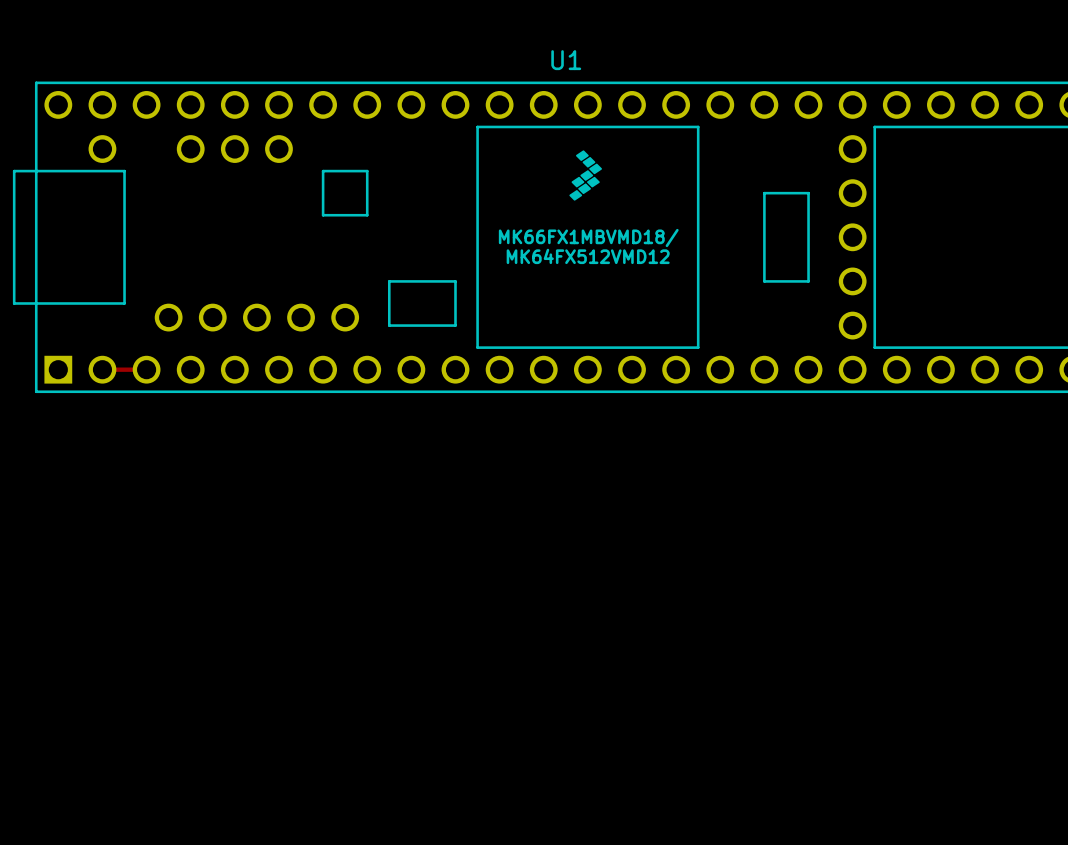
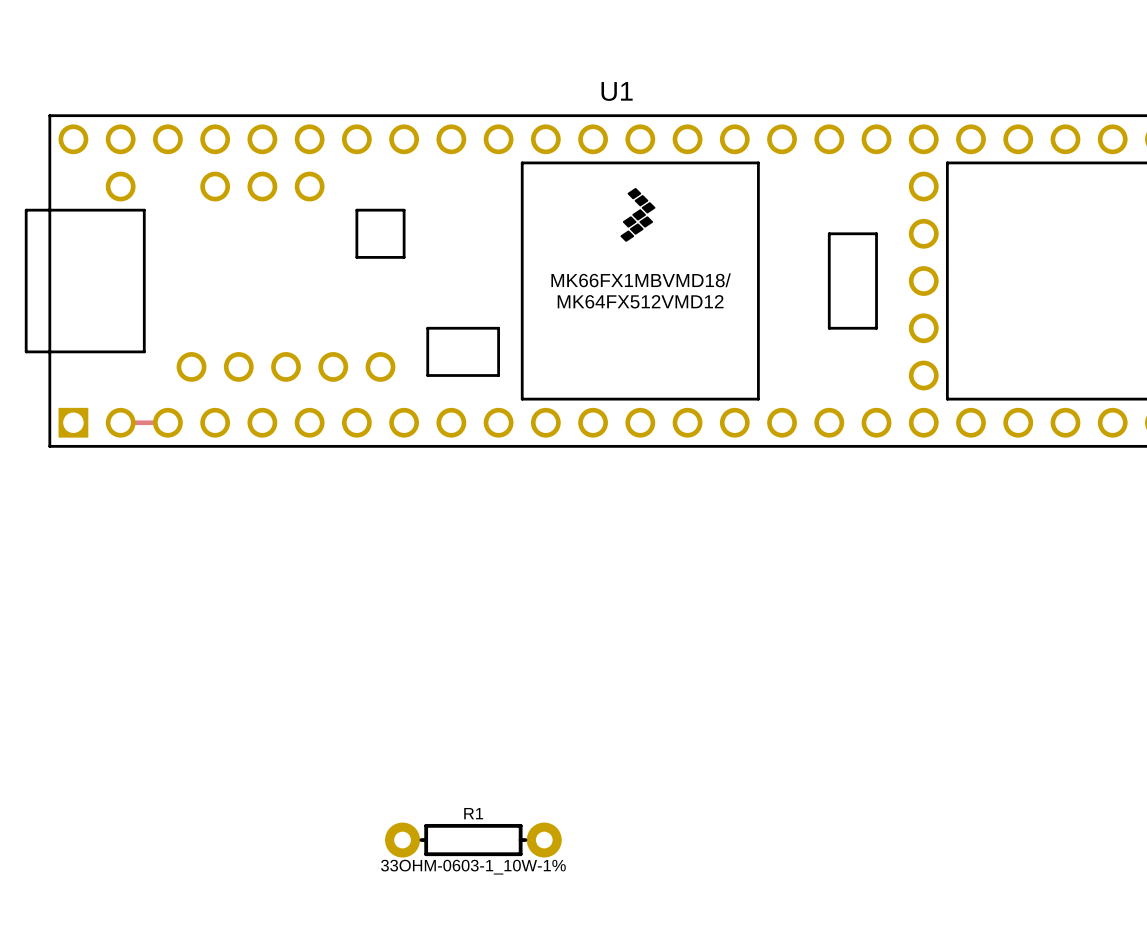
R1: none -> 33OHM-0603-1_10W-1% (473, 840)

